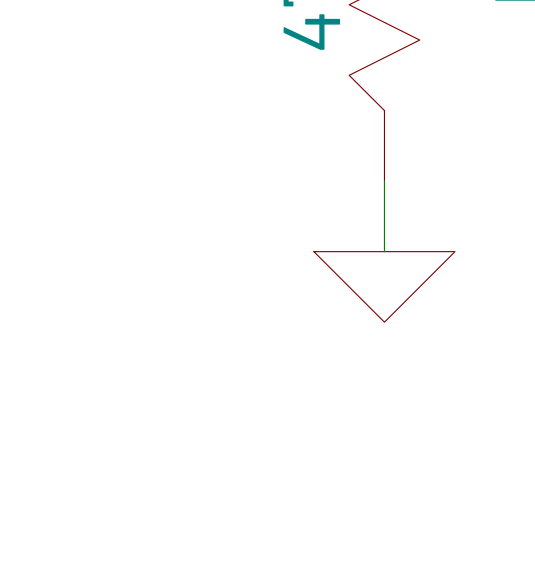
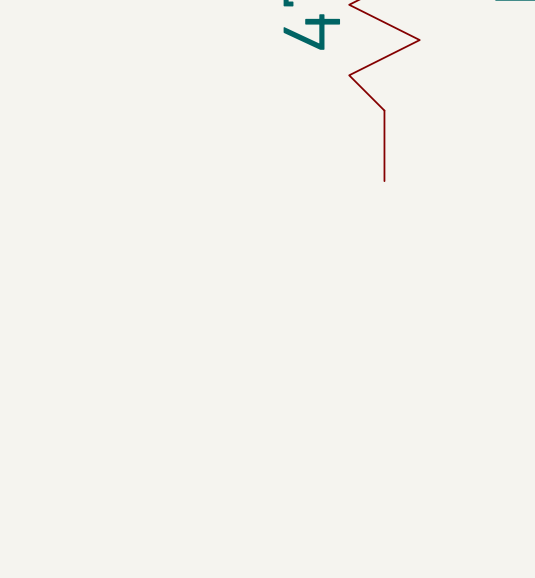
wire: (384, 181) (384, 251) -> none
power symbol: (384, 286) -> none

